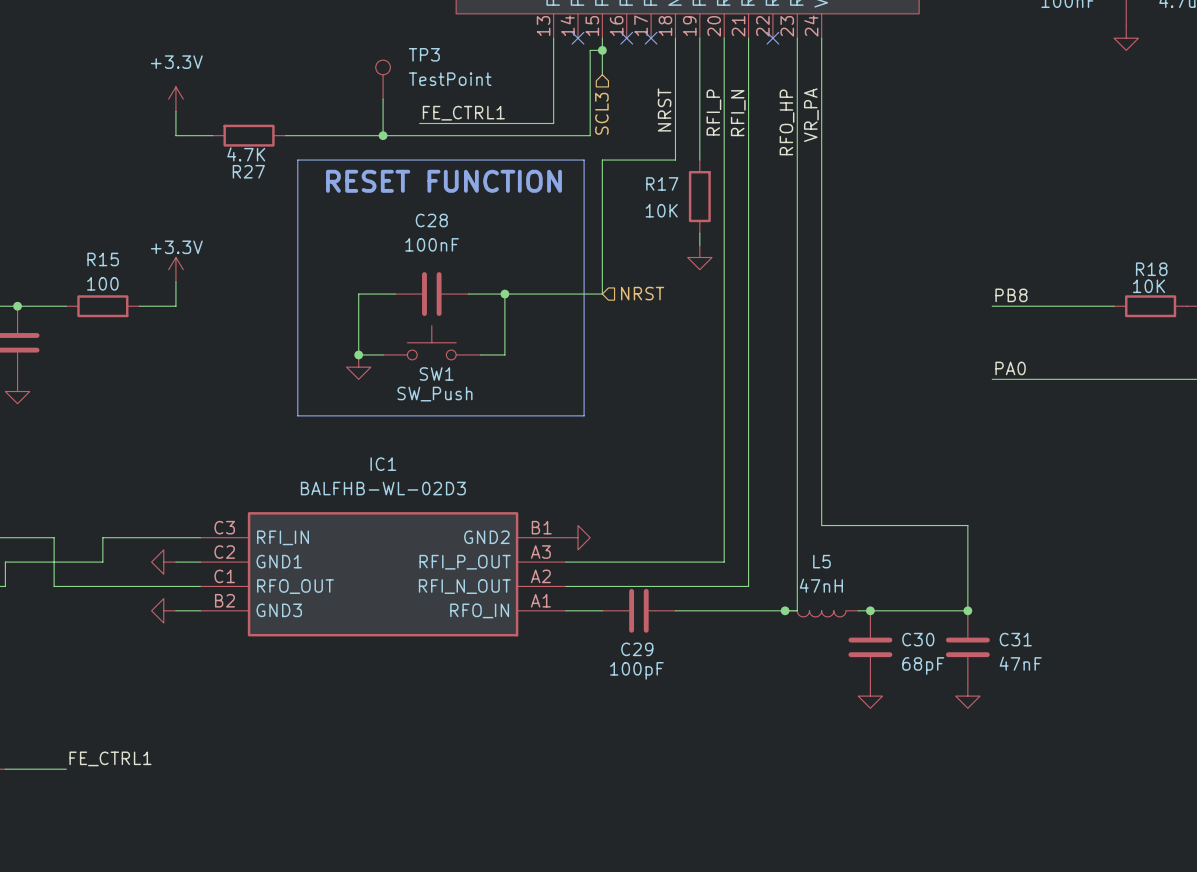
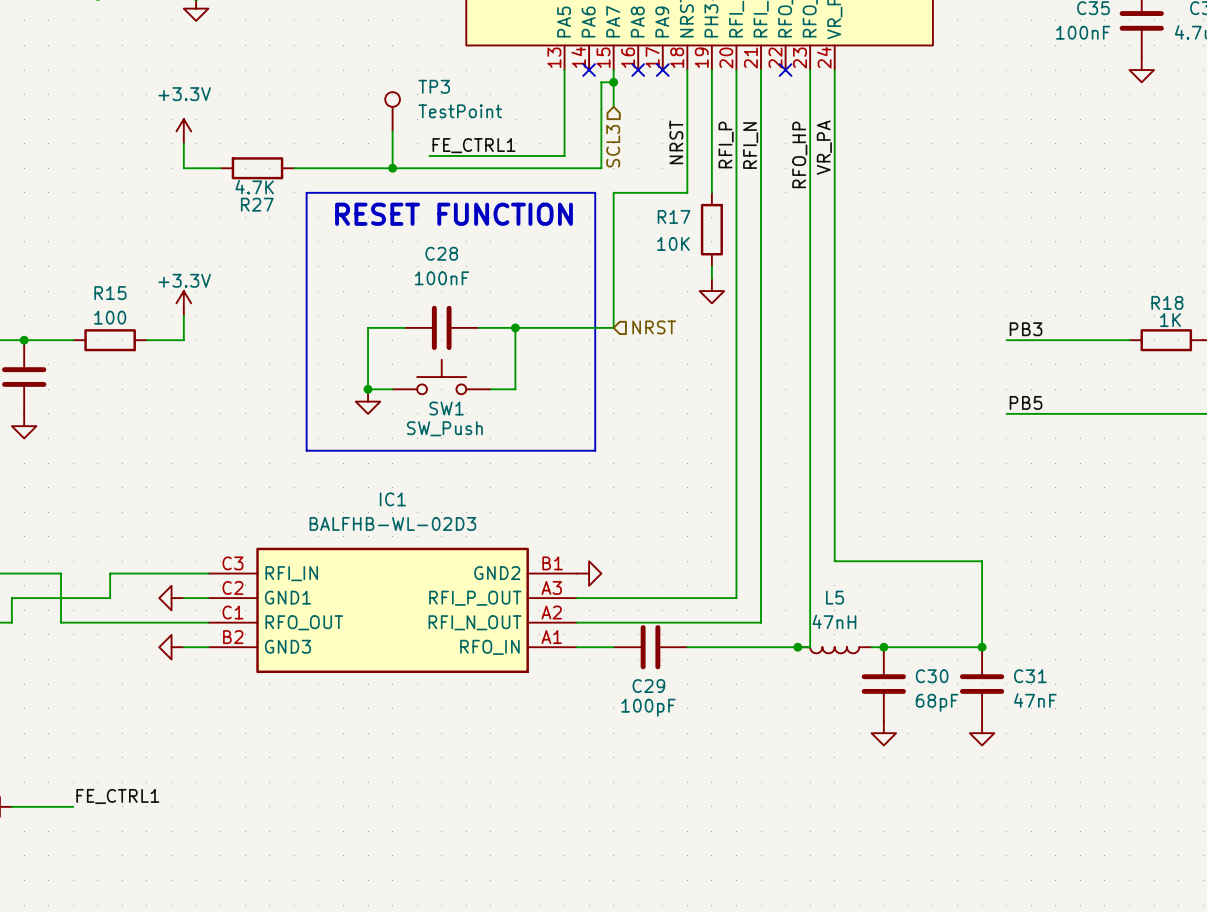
R18 value: 10K (1149, 286) -> 1K (1170, 320)
label: PB8 (1011, 295) -> PB3 (1026, 329)
label: PA0 (1010, 368) -> PB5 (1026, 402)

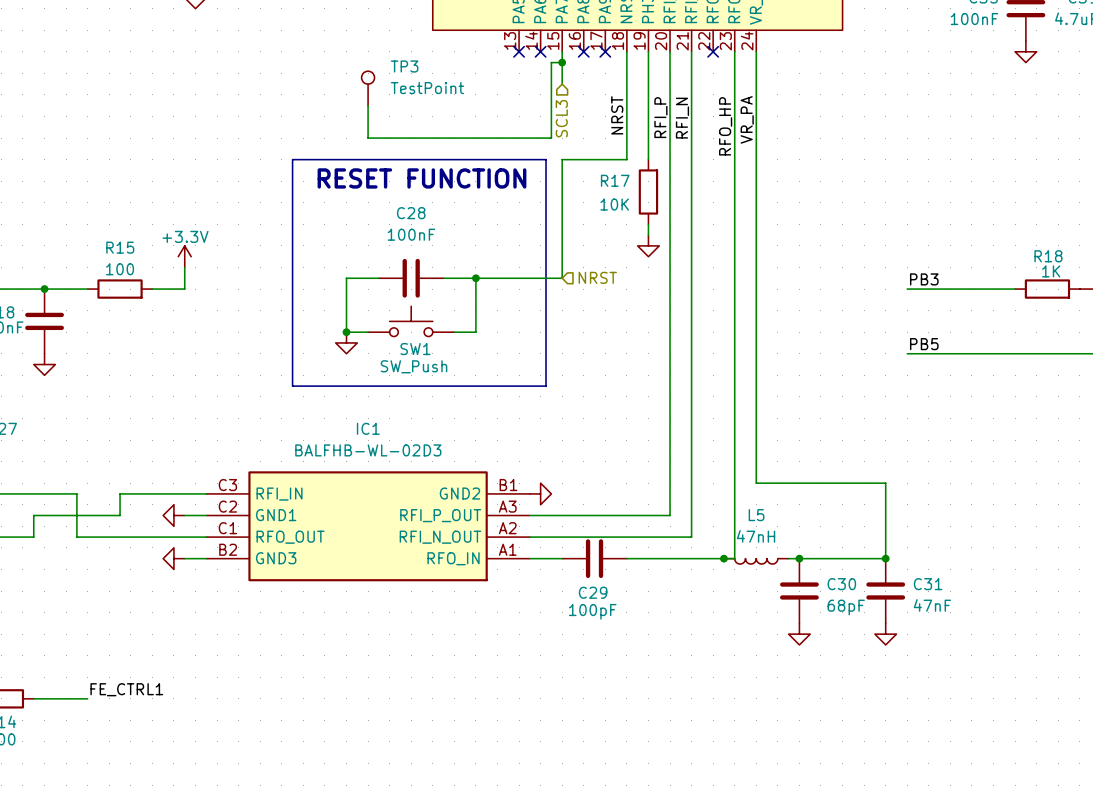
wire: (564, 70) (564, 155) (429, 155) -> none
no-connect mark: none -> (519, 51)
power symbol: +3.3V (183, 131) -> none
wire: (183, 143) (183, 168) (220, 168) -> none
label: FE_CTRL1 (473, 145) -> none
R27: 4.7K (257, 168) -> none
wire: (294, 168) (392, 168) -> none
junction: (392, 168) -> none

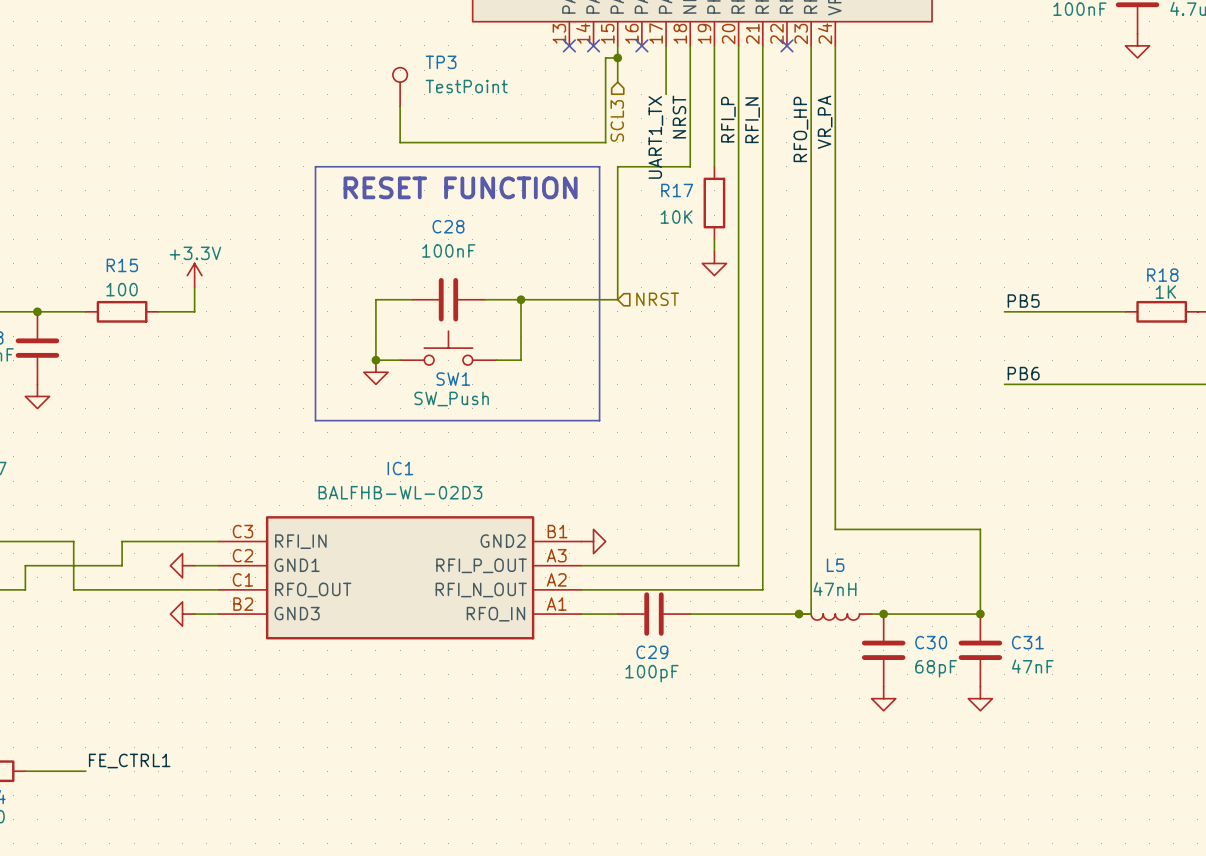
wire: none -> (666, 45) (666, 94)
no-connect mark: (605, 51) -> none
label: none -> UART1_TX (655, 137)
label: PB3 (924, 279) -> PB5 (1023, 301)
label: PB5 (924, 344) -> PB6 (1023, 373)

